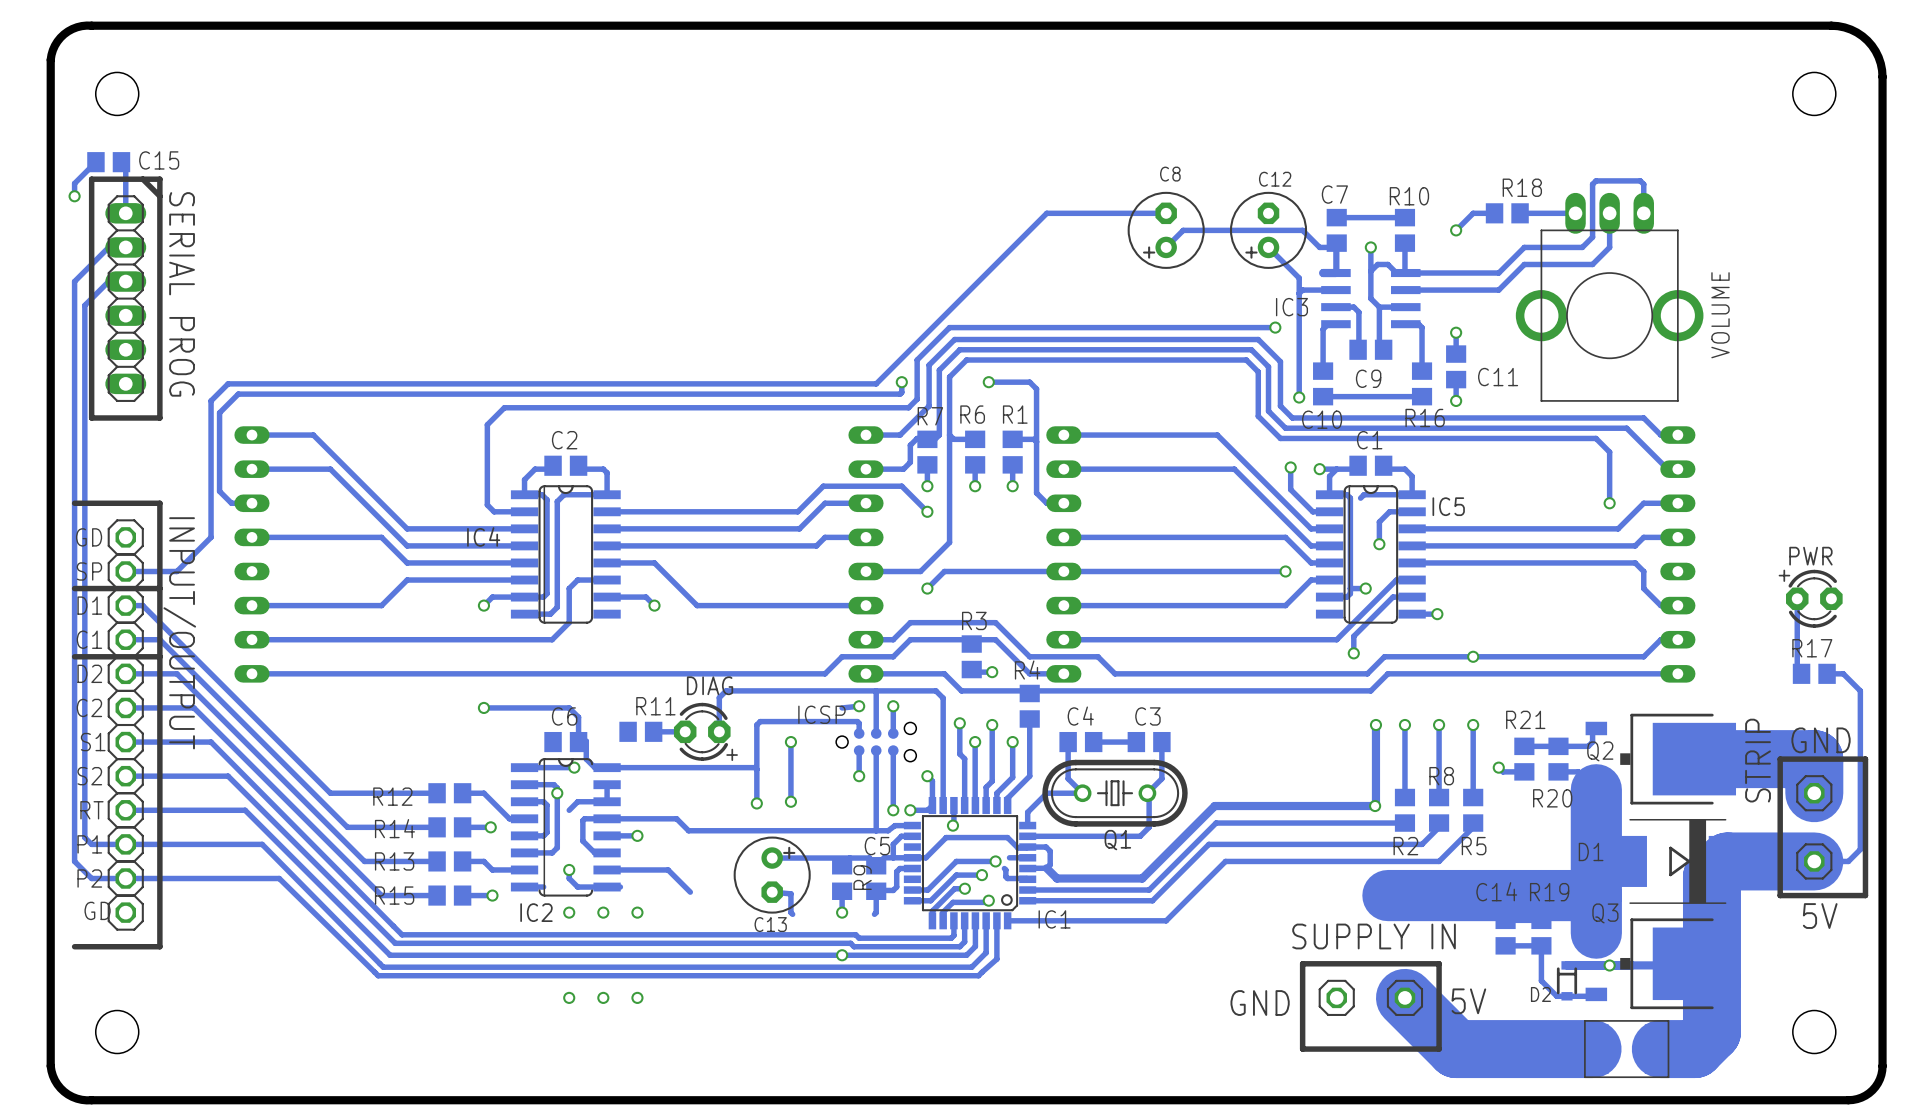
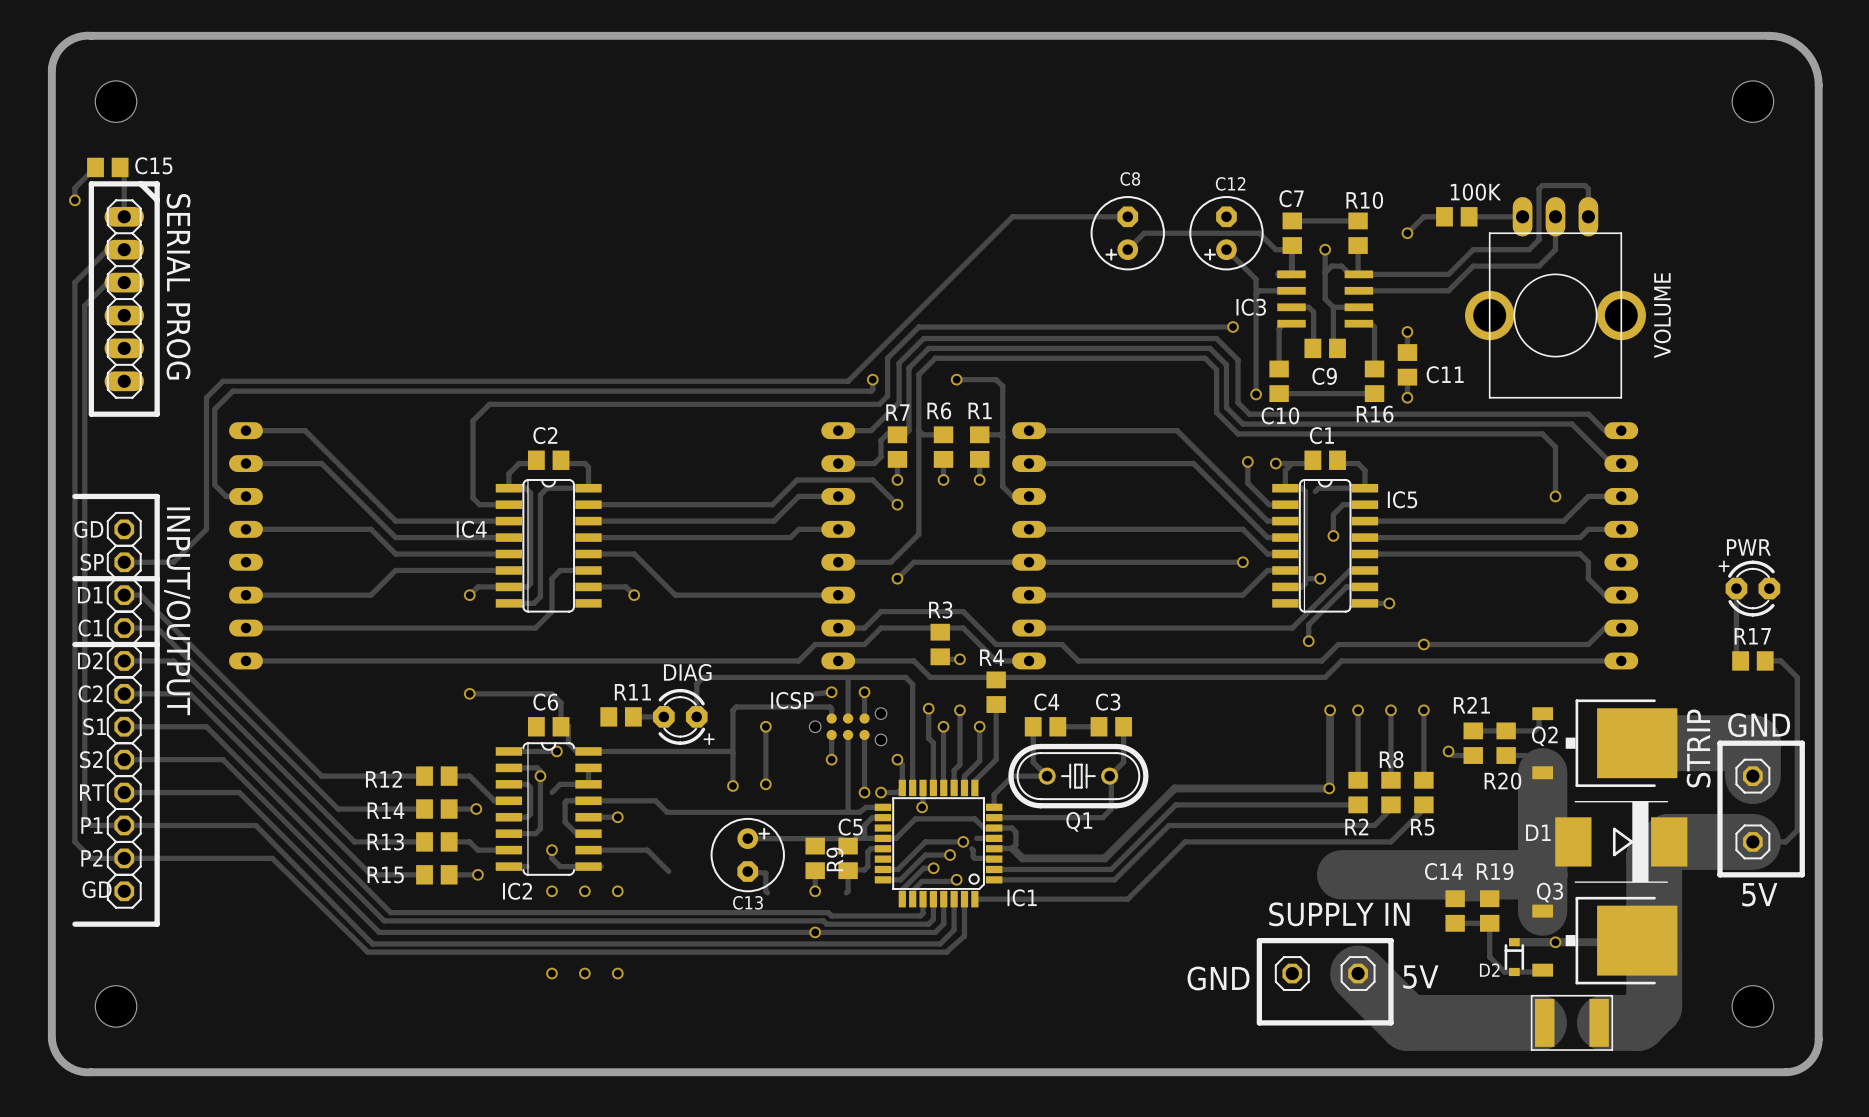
R18 name: R18 (1522, 187) -> 100K (1475, 192)

